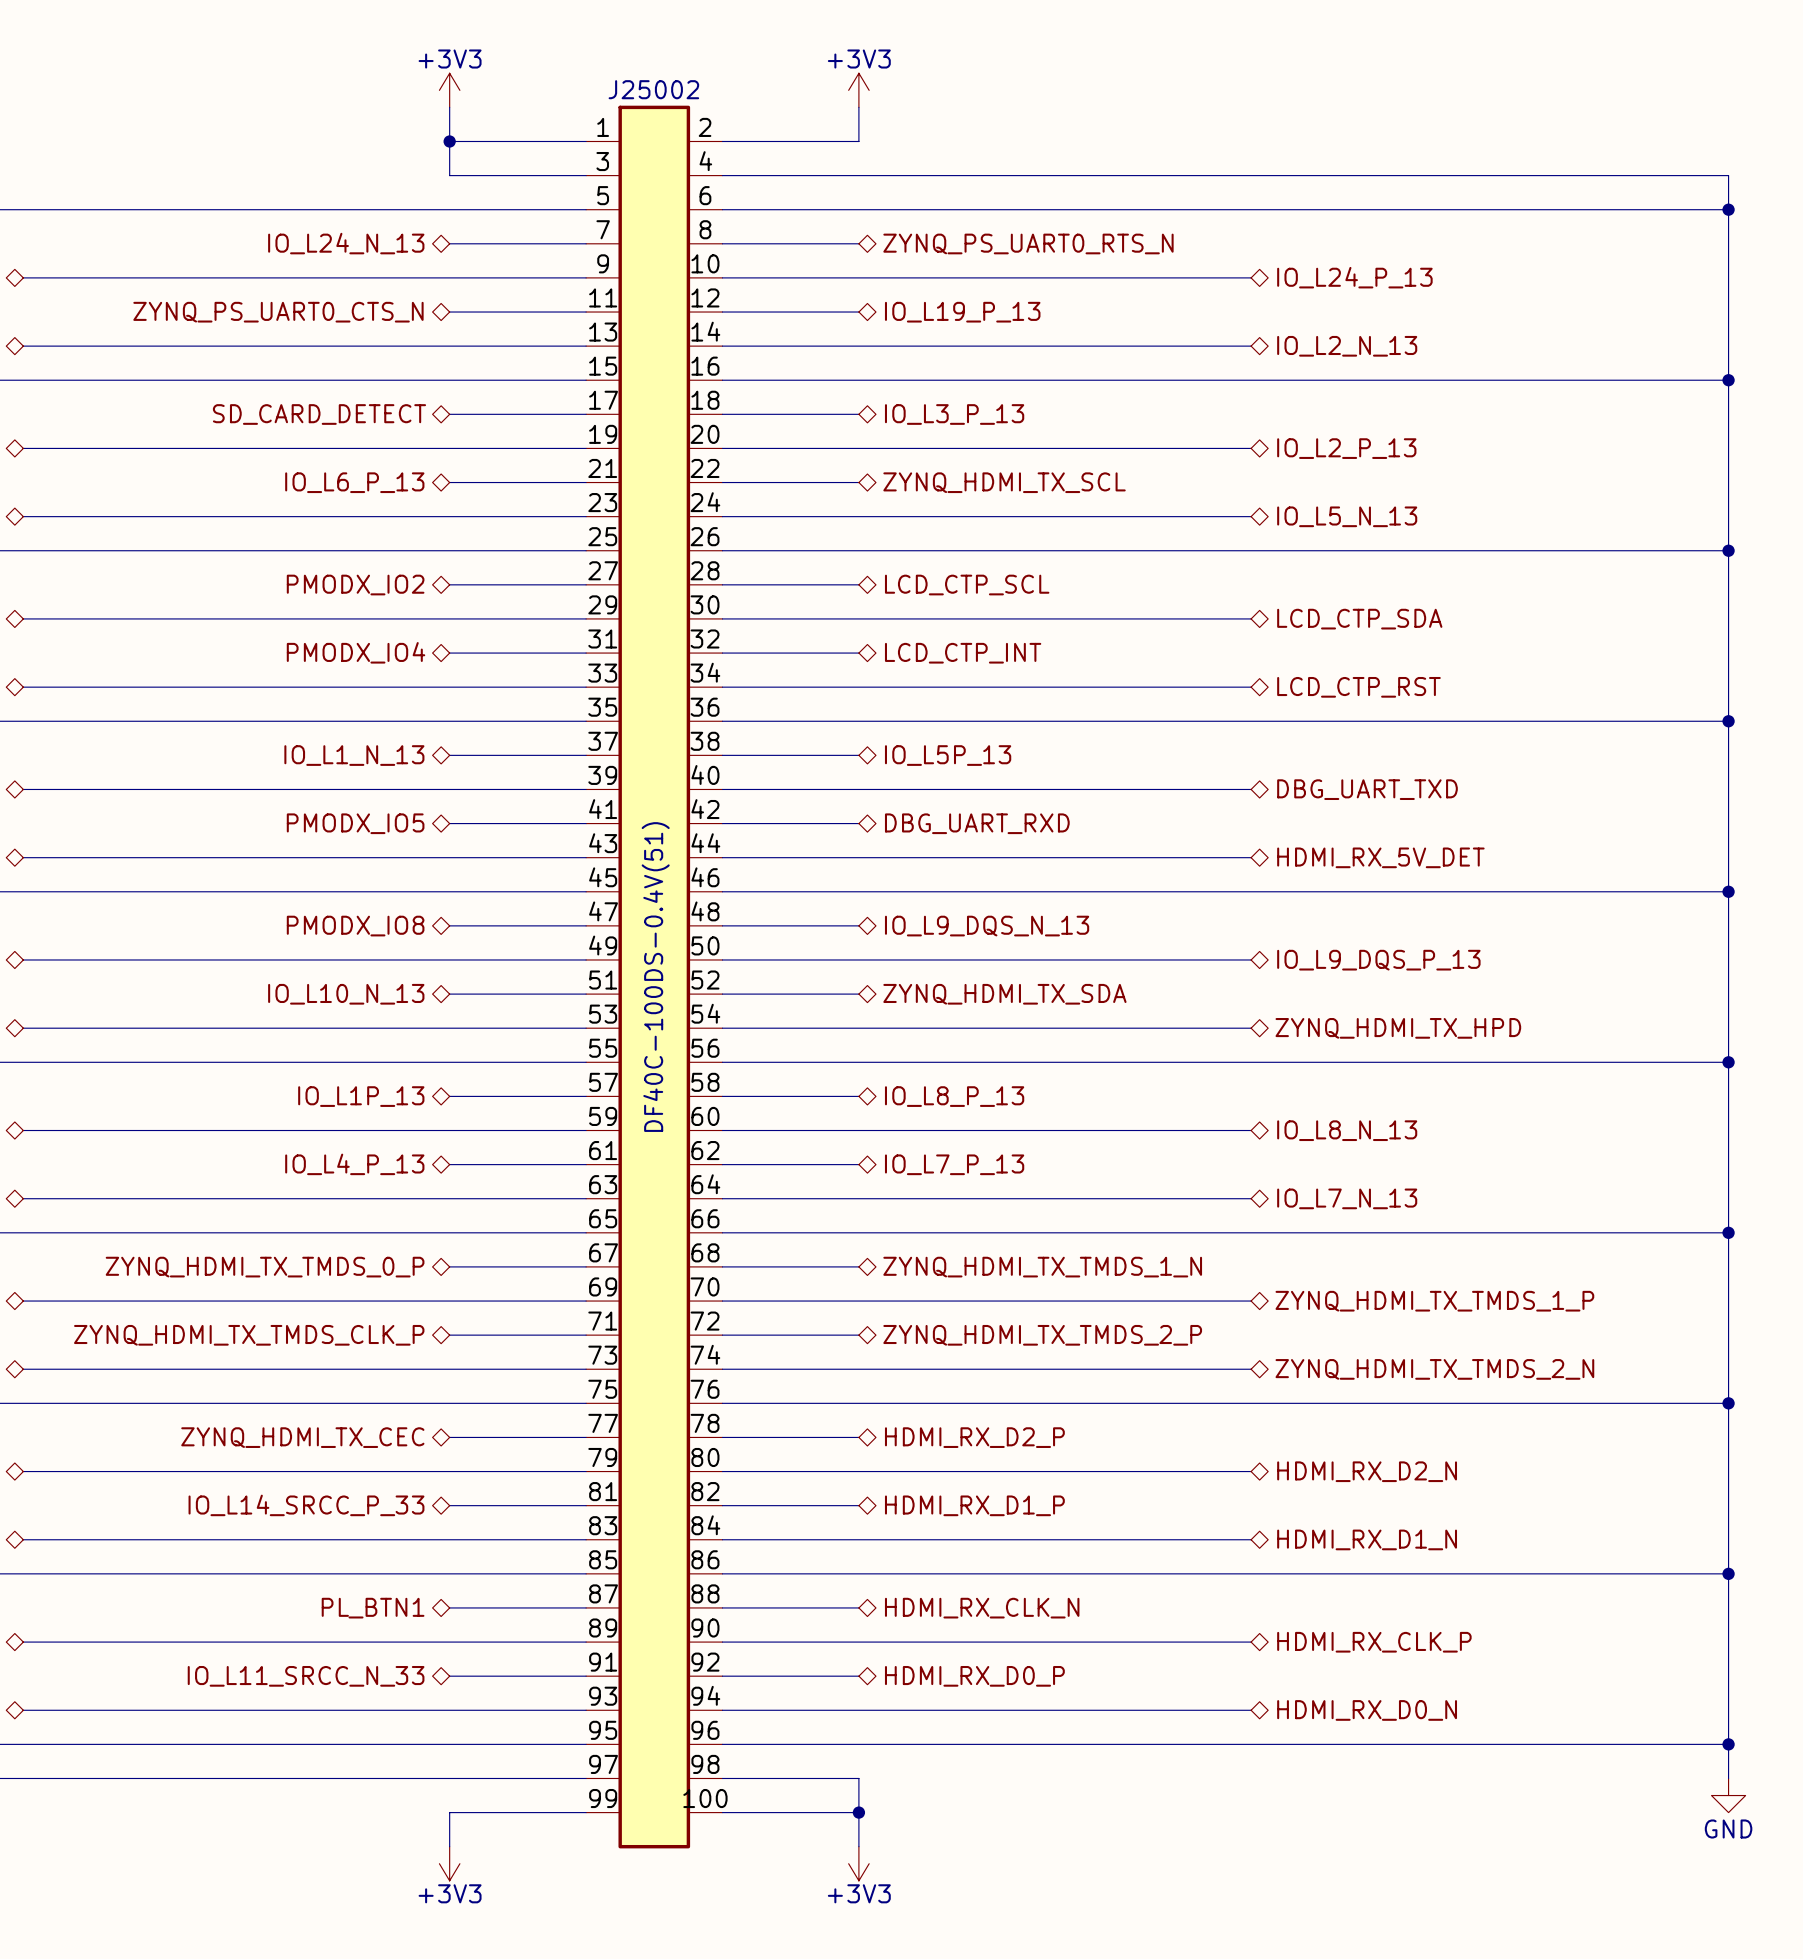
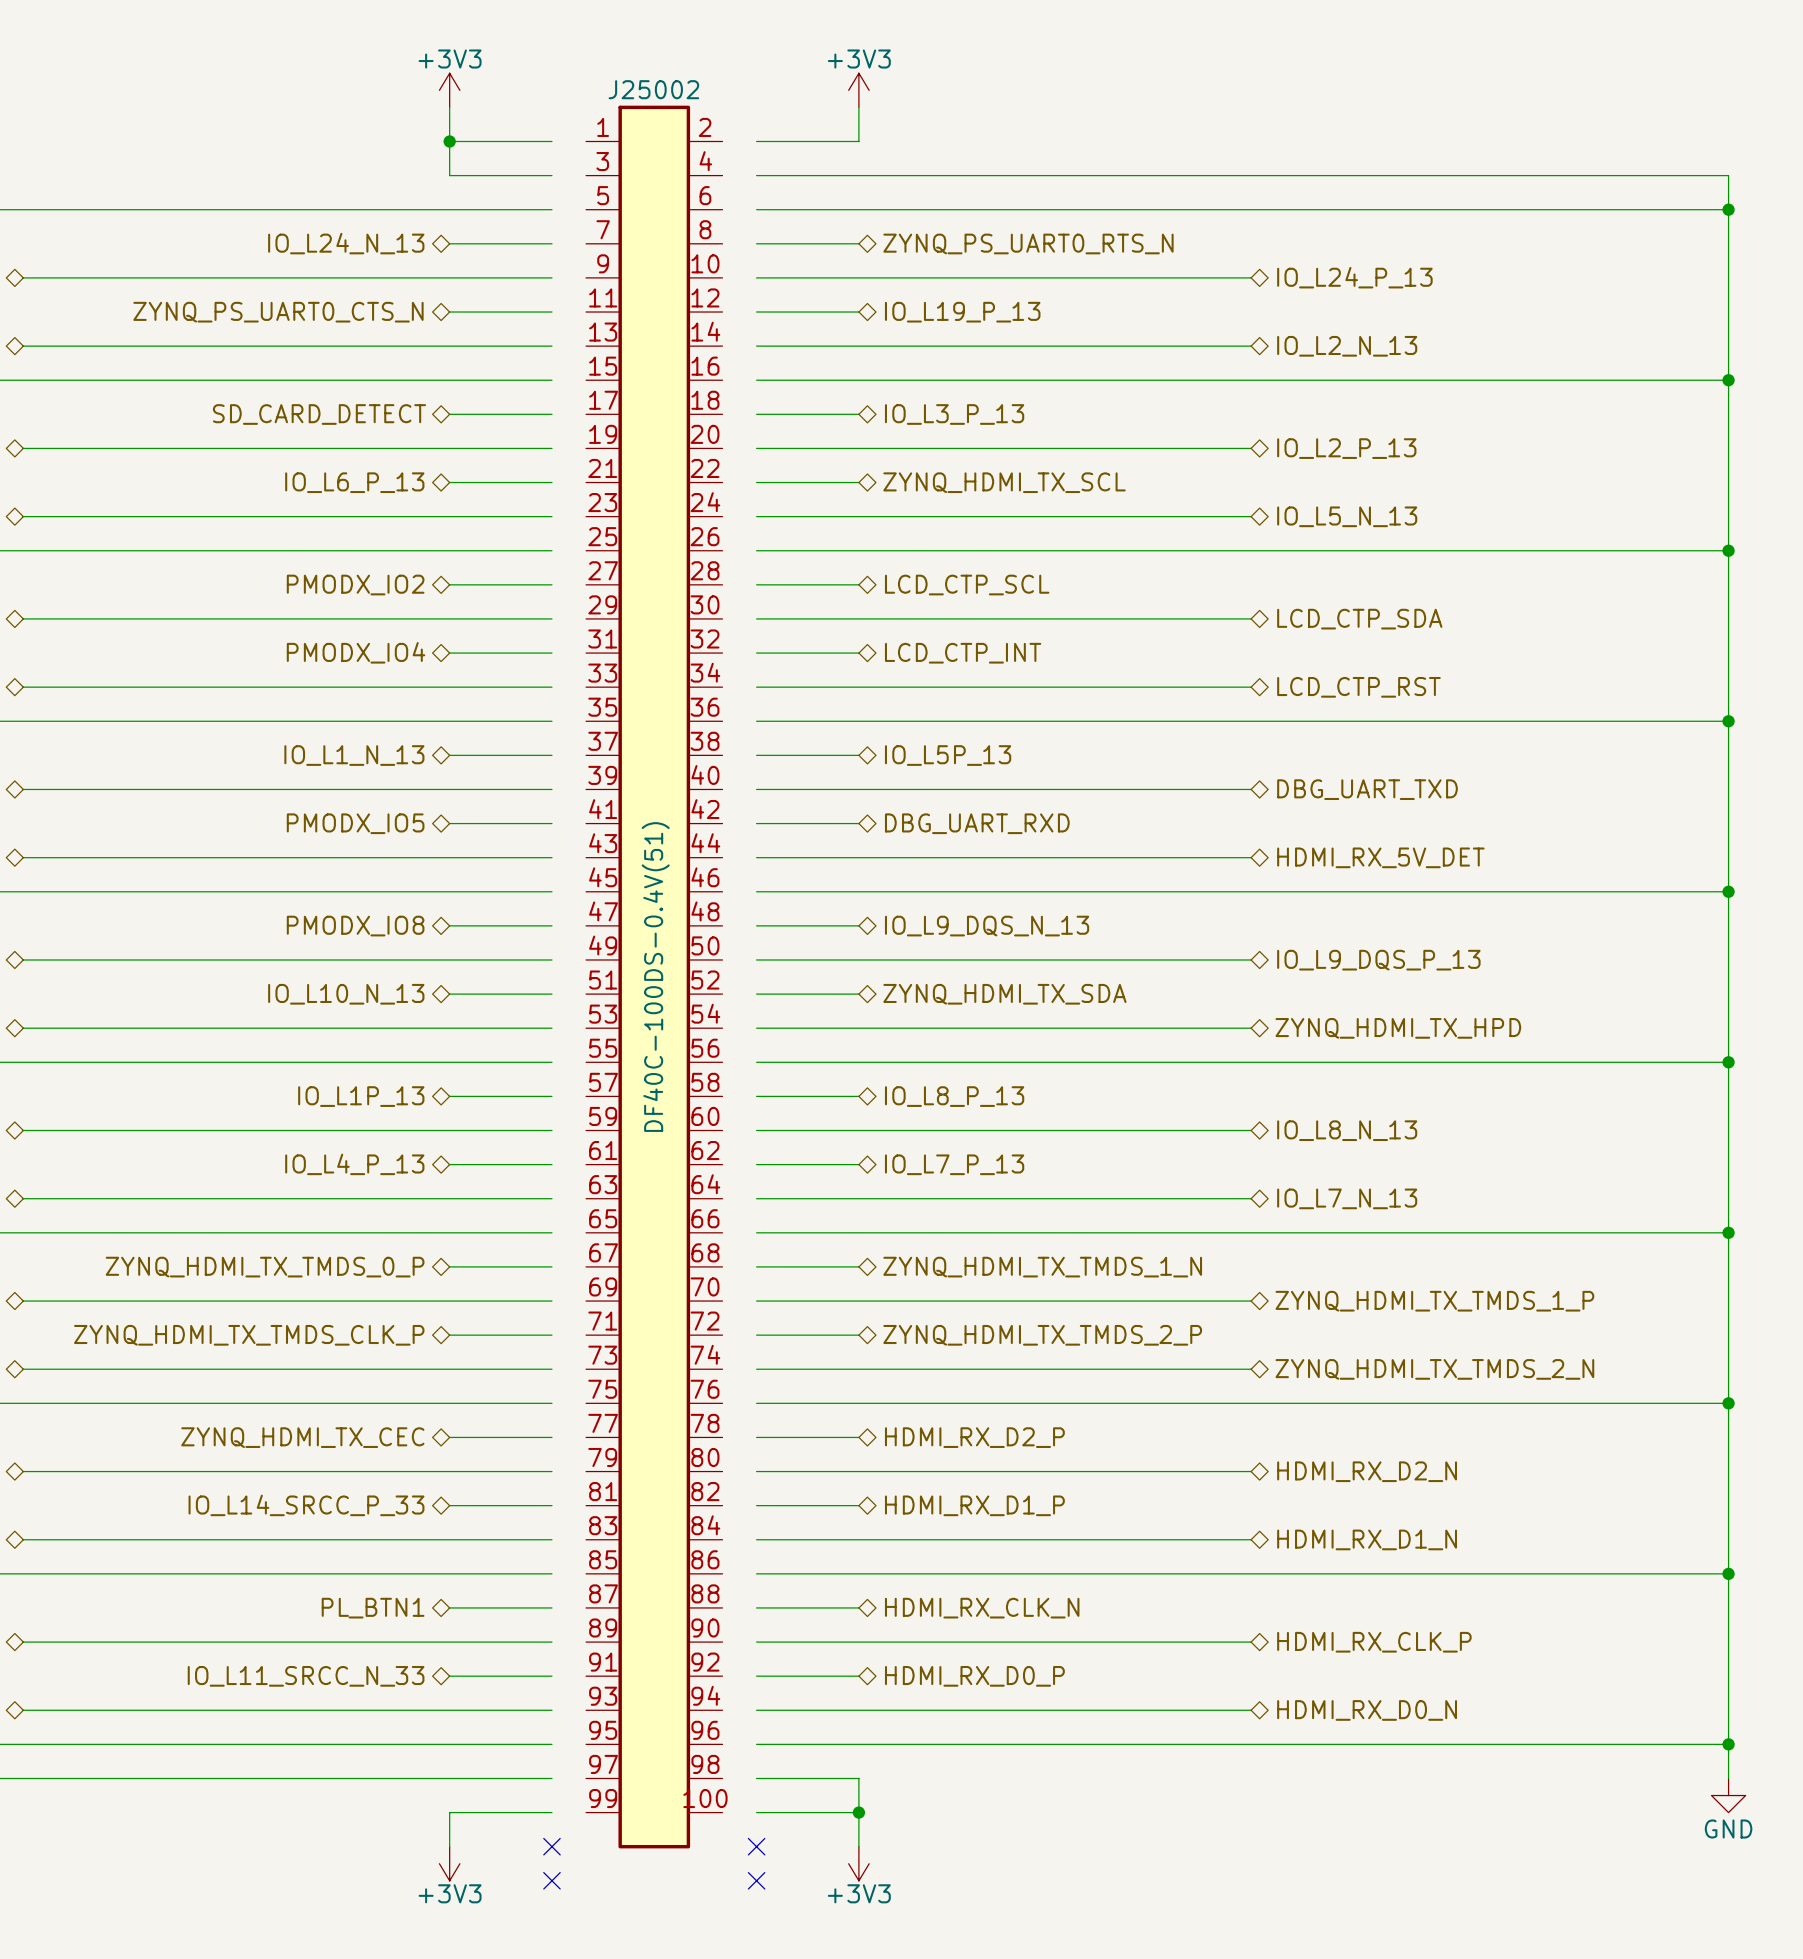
wire: (551, 141) (586, 141) -> none
wire: (722, 141) (756, 141) -> none
wire: (551, 175) (586, 175) -> none
wire: (722, 175) (756, 175) -> none
wire: (551, 209) (586, 209) -> none
wire: (722, 209) (756, 209) -> none
wire: (551, 243) (586, 243) -> none
wire: (722, 243) (756, 243) -> none
wire: (551, 277) (586, 277) -> none
wire: (722, 277) (756, 277) -> none
wire: (551, 312) (586, 312) -> none
wire: (722, 312) (756, 312) -> none
wire: (551, 346) (586, 346) -> none
wire: (722, 346) (756, 346) -> none
wire: (551, 380) (586, 380) -> none
wire: (722, 380) (756, 380) -> none
wire: (551, 414) (586, 414) -> none
wire: (722, 414) (756, 414) -> none
wire: (551, 448) (586, 448) -> none
wire: (722, 448) (756, 448) -> none
wire: (551, 482) (586, 482) -> none
wire: (722, 482) (756, 482) -> none
wire: (551, 516) (586, 516) -> none
wire: (722, 516) (756, 516) -> none
wire: (551, 550) (586, 550) -> none
wire: (722, 550) (756, 550) -> none
wire: (551, 584) (586, 584) -> none
wire: (722, 584) (756, 584) -> none
wire: (551, 618) (586, 618) -> none
wire: (722, 618) (756, 618) -> none
wire: (551, 653) (586, 653) -> none
wire: (722, 653) (756, 653) -> none
wire: (551, 687) (586, 687) -> none
wire: (722, 687) (756, 687) -> none
wire: (551, 721) (586, 721) -> none
wire: (722, 721) (756, 721) -> none
wire: (551, 755) (586, 755) -> none
wire: (722, 755) (756, 755) -> none
wire: (551, 789) (586, 789) -> none
wire: (722, 789) (756, 789) -> none
wire: (551, 823) (586, 823) -> none
wire: (722, 823) (756, 823) -> none
wire: (551, 857) (586, 857) -> none
wire: (722, 857) (756, 857) -> none
wire: (551, 891) (586, 891) -> none
wire: (722, 891) (756, 891) -> none
wire: (551, 925) (586, 925) -> none
wire: (722, 925) (756, 925) -> none
wire: (551, 959) (586, 959) -> none
wire: (722, 959) (756, 959) -> none
wire: (551, 994) (586, 994) -> none
wire: (722, 994) (756, 994) -> none
wire: (551, 1028) (586, 1028) -> none
wire: (722, 1028) (756, 1028) -> none
wire: (551, 1062) (586, 1062) -> none
wire: (722, 1062) (756, 1062) -> none
wire: (551, 1096) (586, 1096) -> none
wire: (722, 1096) (756, 1096) -> none
wire: (551, 1130) (586, 1130) -> none
wire: (722, 1130) (756, 1130) -> none
wire: (551, 1164) (586, 1164) -> none
wire: (722, 1164) (756, 1164) -> none
wire: (551, 1198) (586, 1198) -> none
wire: (722, 1198) (756, 1198) -> none
wire: (551, 1232) (586, 1232) -> none
wire: (722, 1232) (756, 1232) -> none
wire: (551, 1266) (586, 1266) -> none
wire: (722, 1266) (756, 1266) -> none
wire: (551, 1301) (586, 1301) -> none
wire: (722, 1301) (756, 1301) -> none
wire: (551, 1335) (586, 1335) -> none
wire: (722, 1335) (756, 1335) -> none
wire: (551, 1369) (586, 1369) -> none
wire: (722, 1369) (756, 1369) -> none
wire: (551, 1403) (586, 1403) -> none
wire: (722, 1403) (756, 1403) -> none
wire: (551, 1437) (586, 1437) -> none
wire: (722, 1437) (756, 1437) -> none
wire: (551, 1471) (586, 1471) -> none
wire: (722, 1471) (756, 1471) -> none
wire: (551, 1505) (586, 1505) -> none
wire: (722, 1505) (756, 1505) -> none
wire: (551, 1539) (586, 1539) -> none
wire: (722, 1539) (756, 1539) -> none
wire: (551, 1573) (586, 1573) -> none
wire: (722, 1573) (756, 1573) -> none
wire: (551, 1607) (586, 1607) -> none
wire: (722, 1607) (756, 1607) -> none
wire: (551, 1642) (586, 1642) -> none
wire: (722, 1642) (756, 1642) -> none
wire: (551, 1676) (586, 1676) -> none
wire: (722, 1676) (756, 1676) -> none
wire: (551, 1710) (586, 1710) -> none
wire: (722, 1710) (756, 1710) -> none
wire: (551, 1744) (586, 1744) -> none
wire: (722, 1744) (756, 1744) -> none
wire: (551, 1778) (586, 1778) -> none
wire: (722, 1778) (756, 1778) -> none
wire: (551, 1812) (586, 1812) -> none
wire: (722, 1812) (756, 1812) -> none
no-connect mark: none -> (551, 1846)
no-connect mark: none -> (756, 1846)
no-connect mark: none -> (551, 1880)
no-connect mark: none -> (756, 1880)

